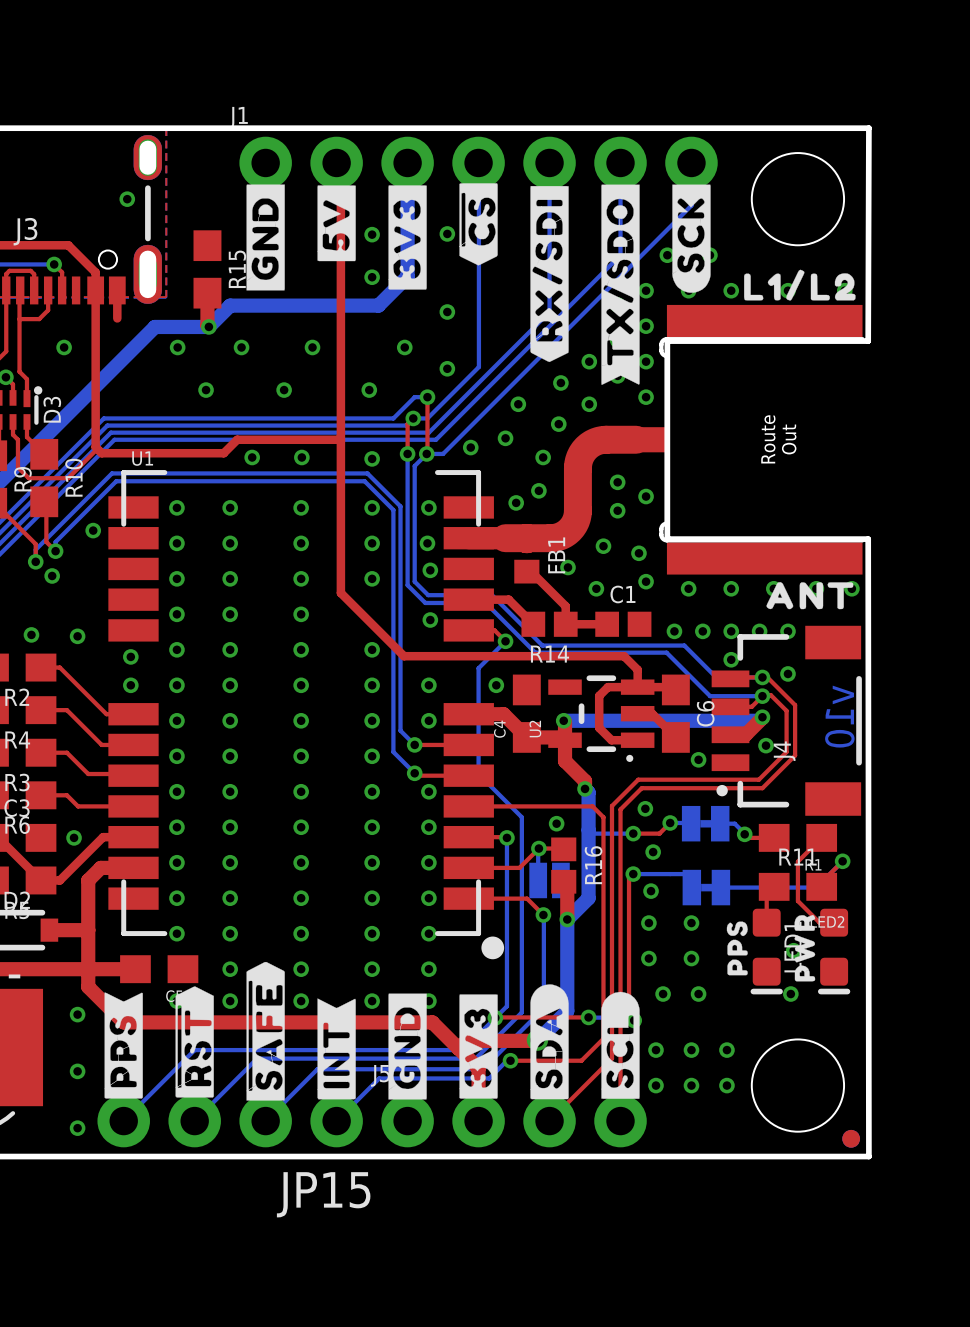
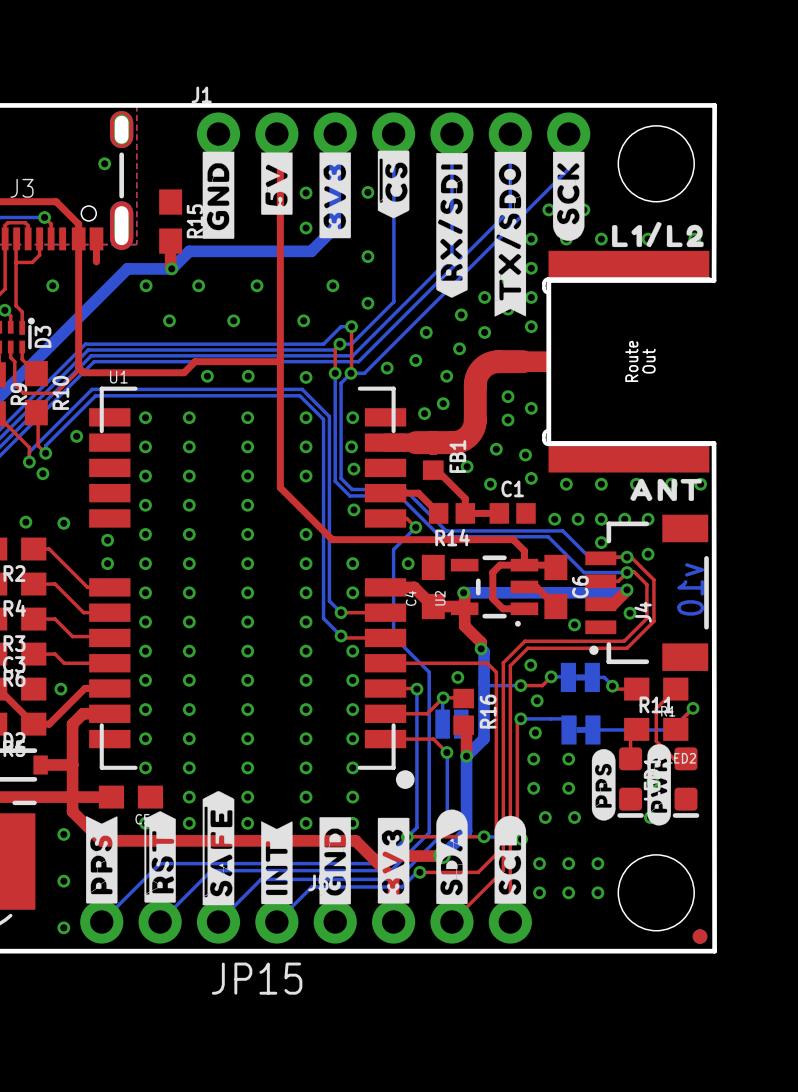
drawing shape: [794, 914, 816, 982] -> [647, 744, 672, 826]
drawing shape: [726, 921, 748, 976] -> [591, 749, 616, 821]

